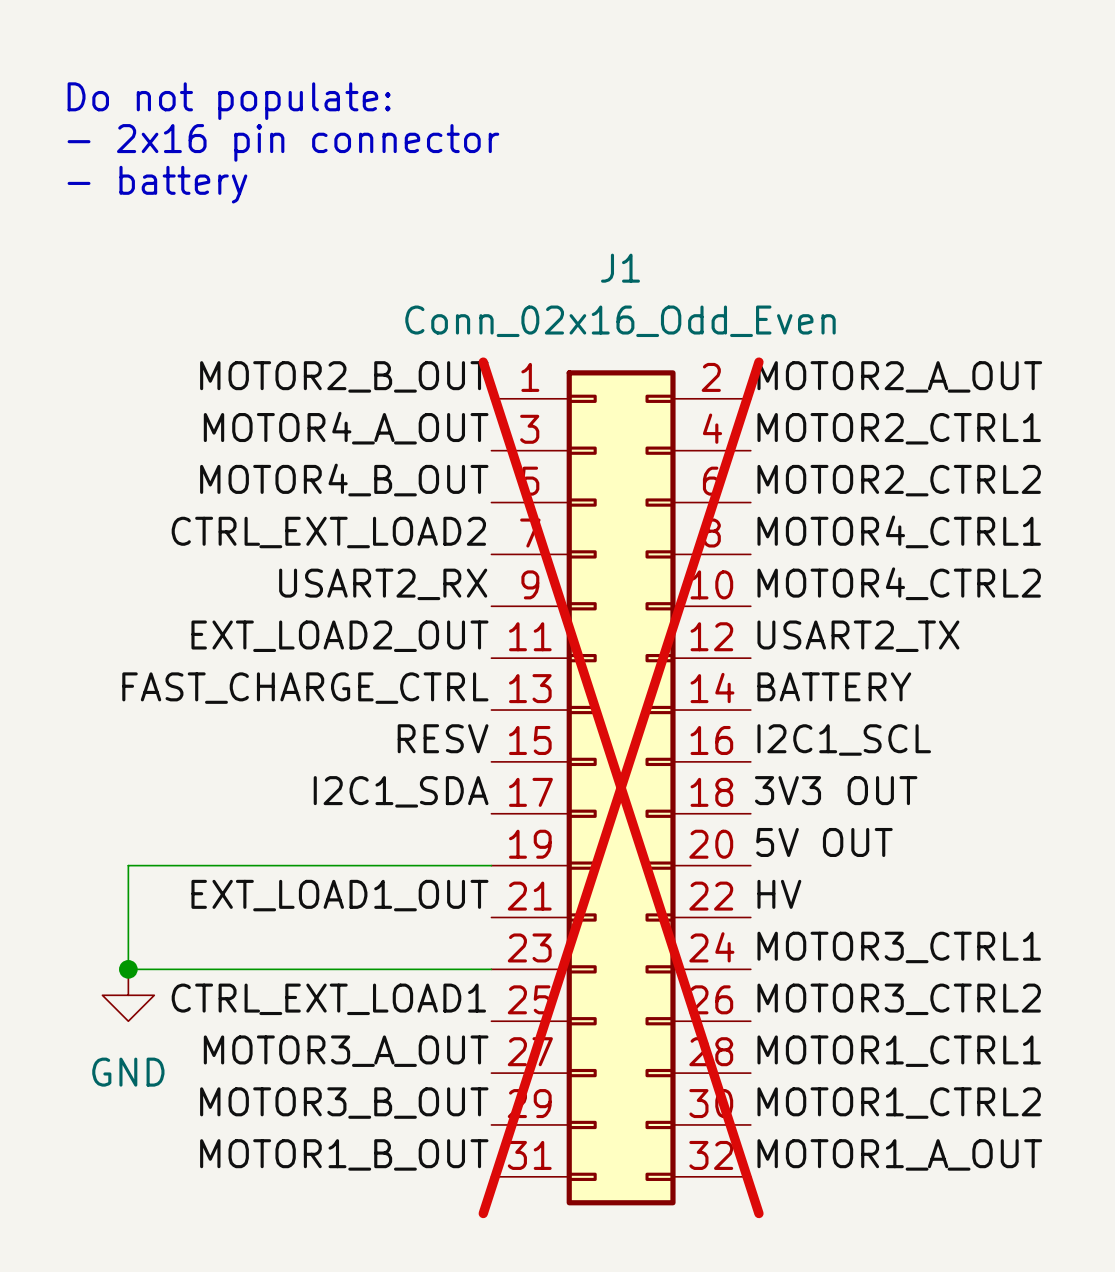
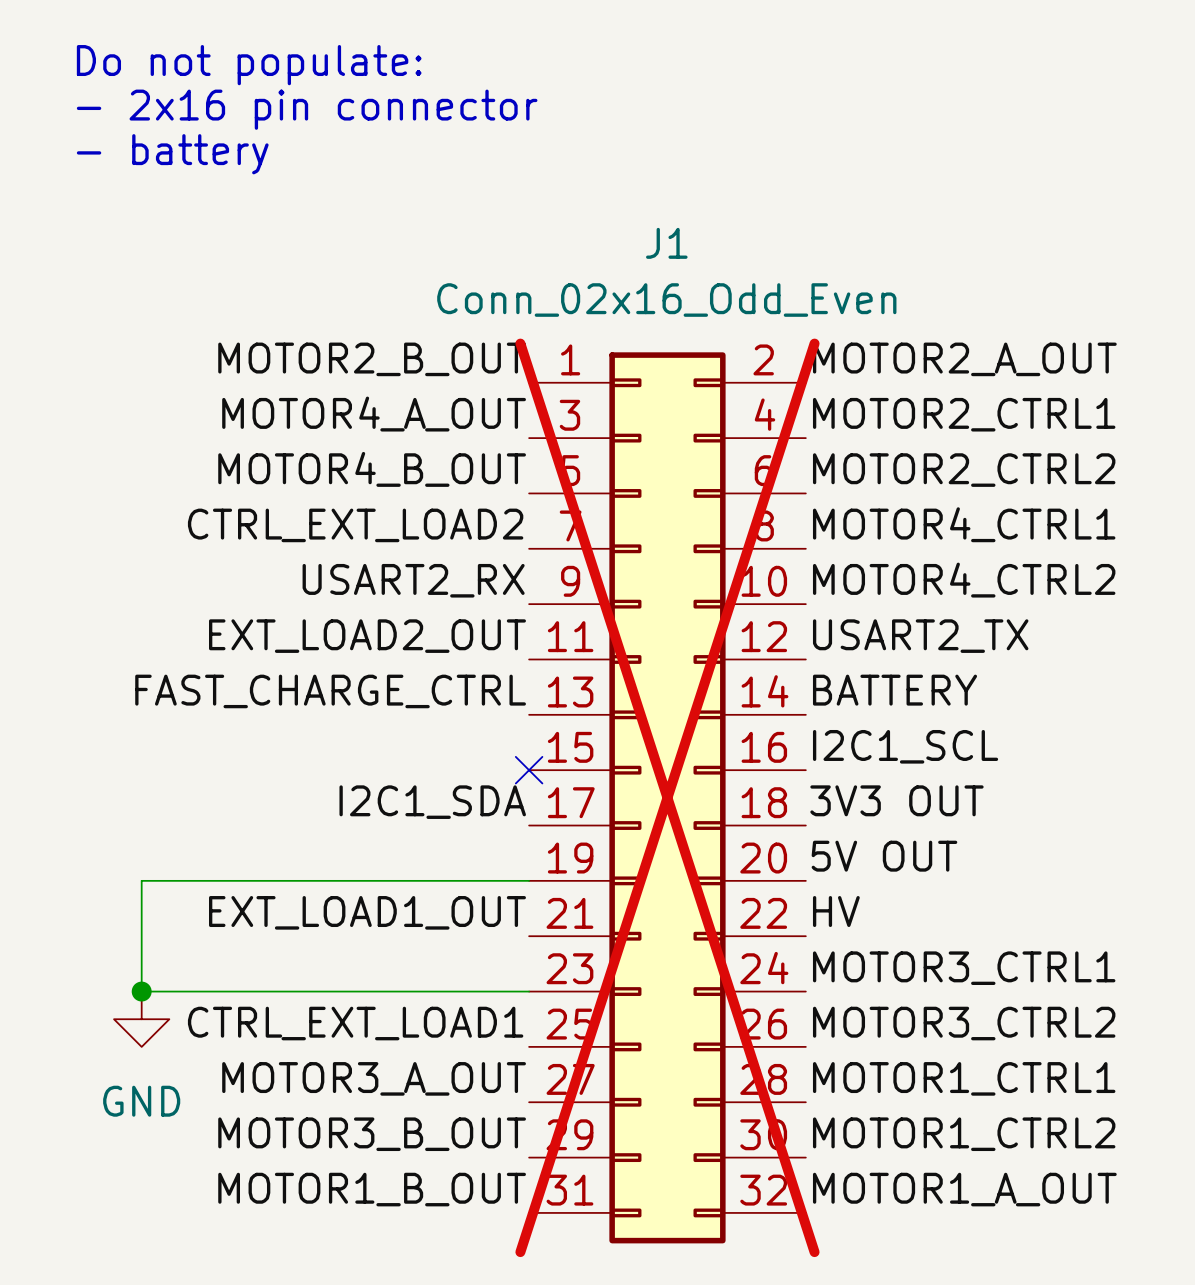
label: RESV (443, 738) -> none
no-connect mark: none -> (529, 770)

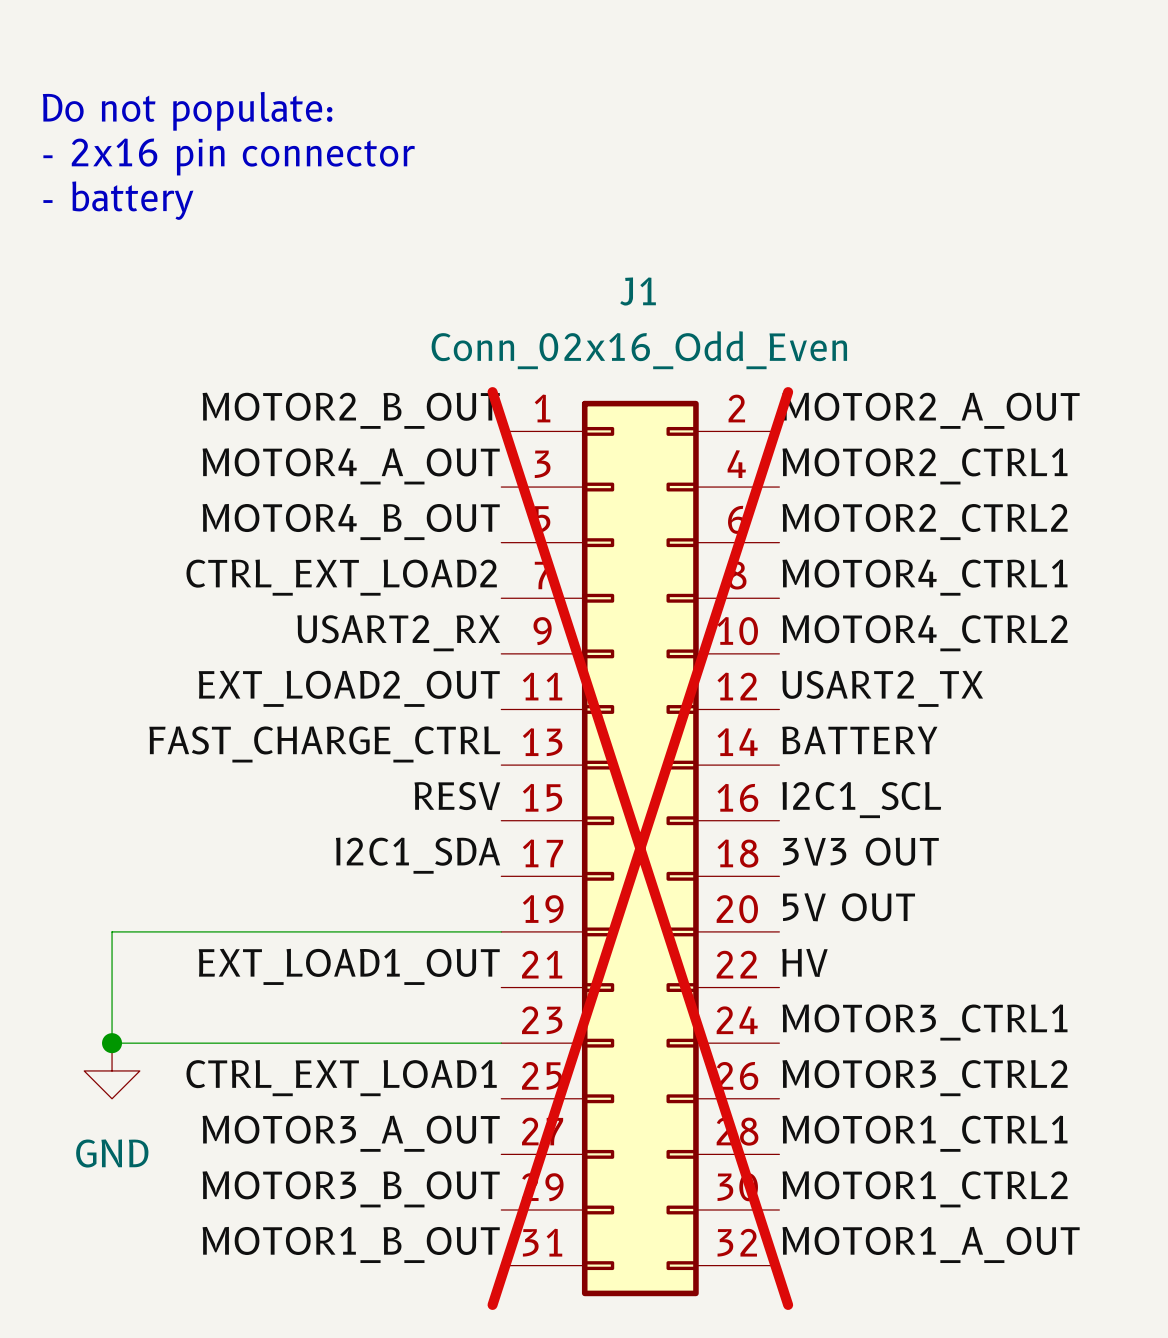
label: none -> RESV (457, 796)
no-connect mark: (529, 770) -> none

